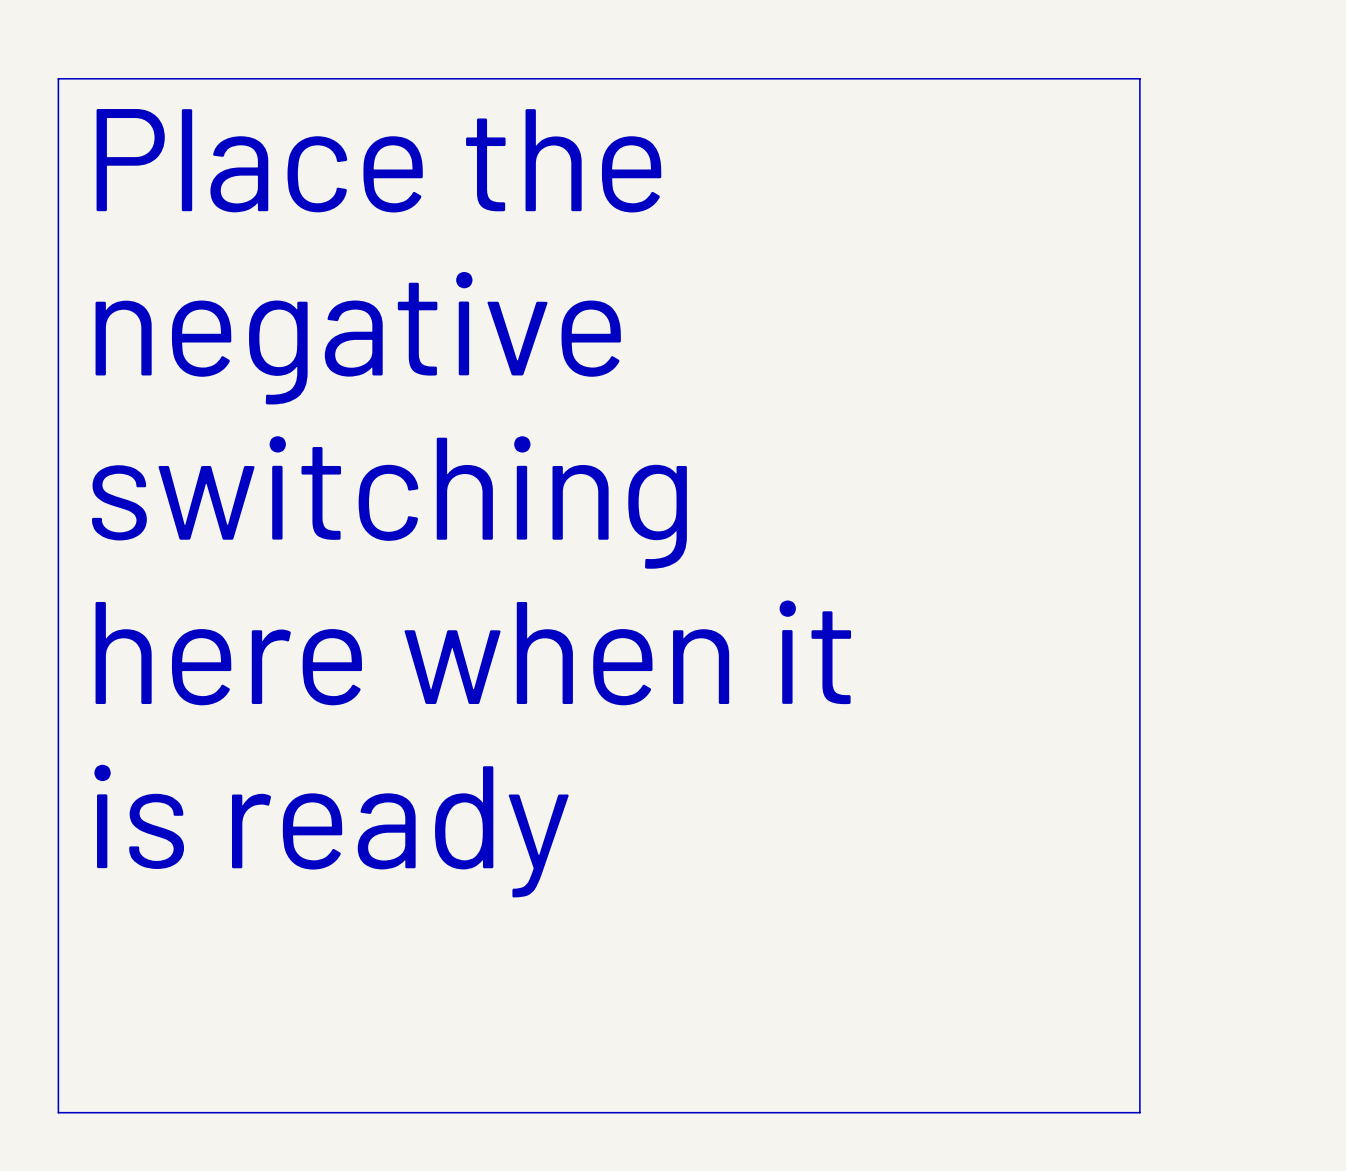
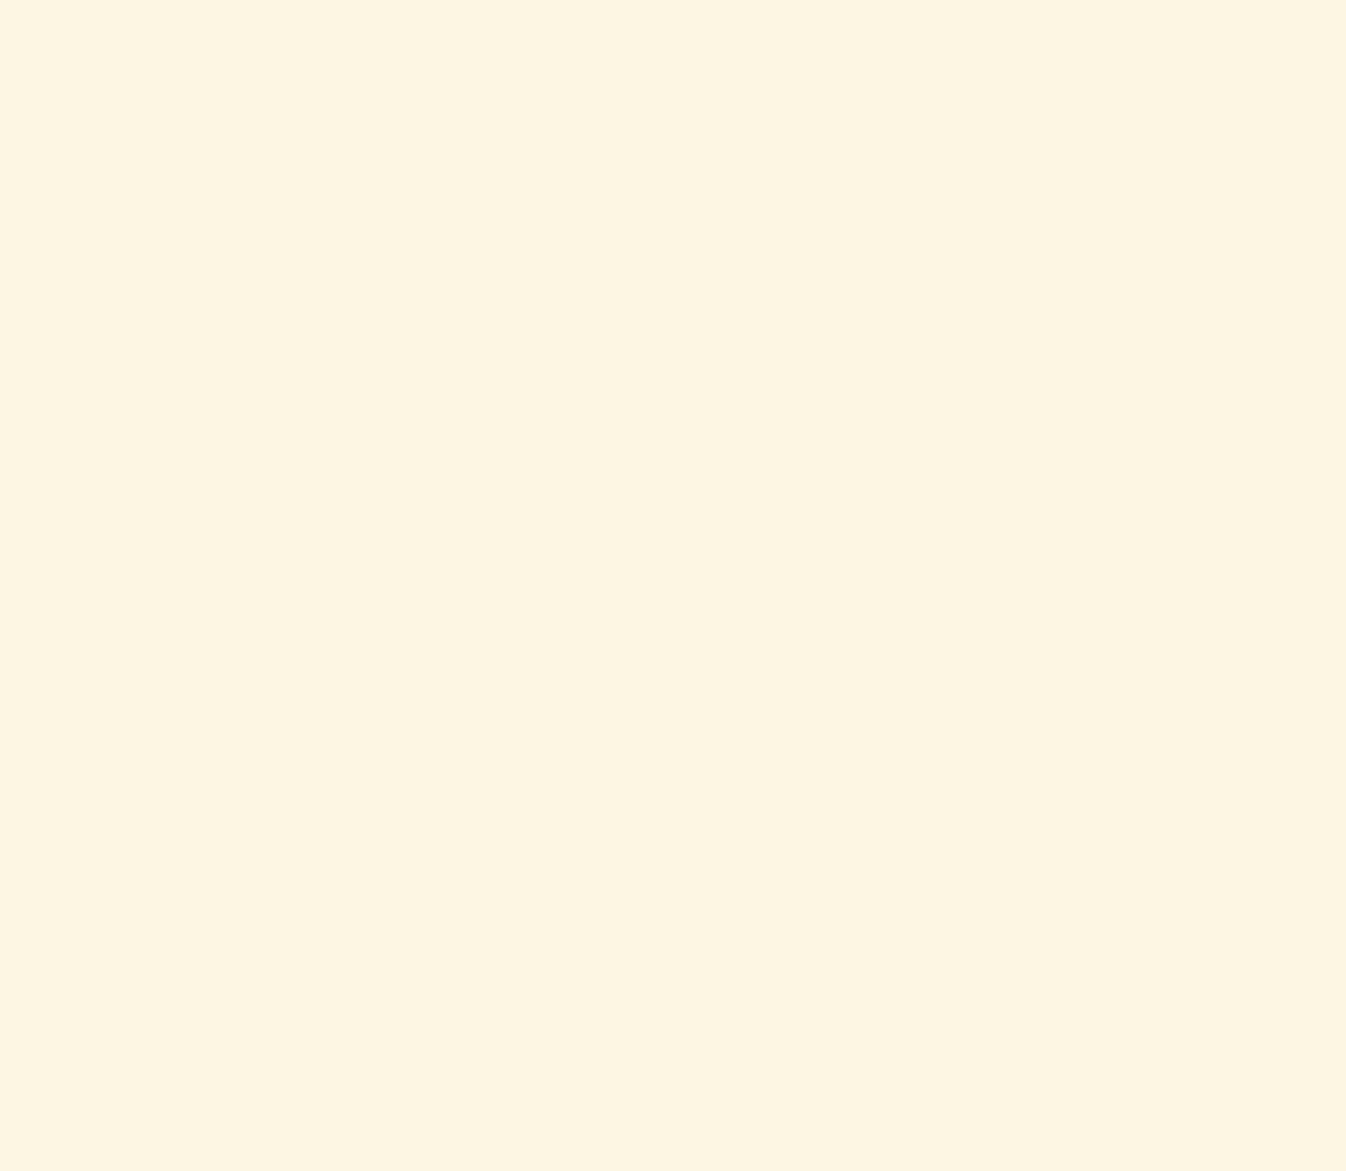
line: (58, 78) (1139, 78) (1139, 1112) (58, 1112) (58, 78) -> none
text: Place the (378, 160) -> none
text: negative (358, 338) -> none
text: switching (389, 502) -> none
text: here when it (473, 652) -> none
text: is ready (331, 831) -> none

